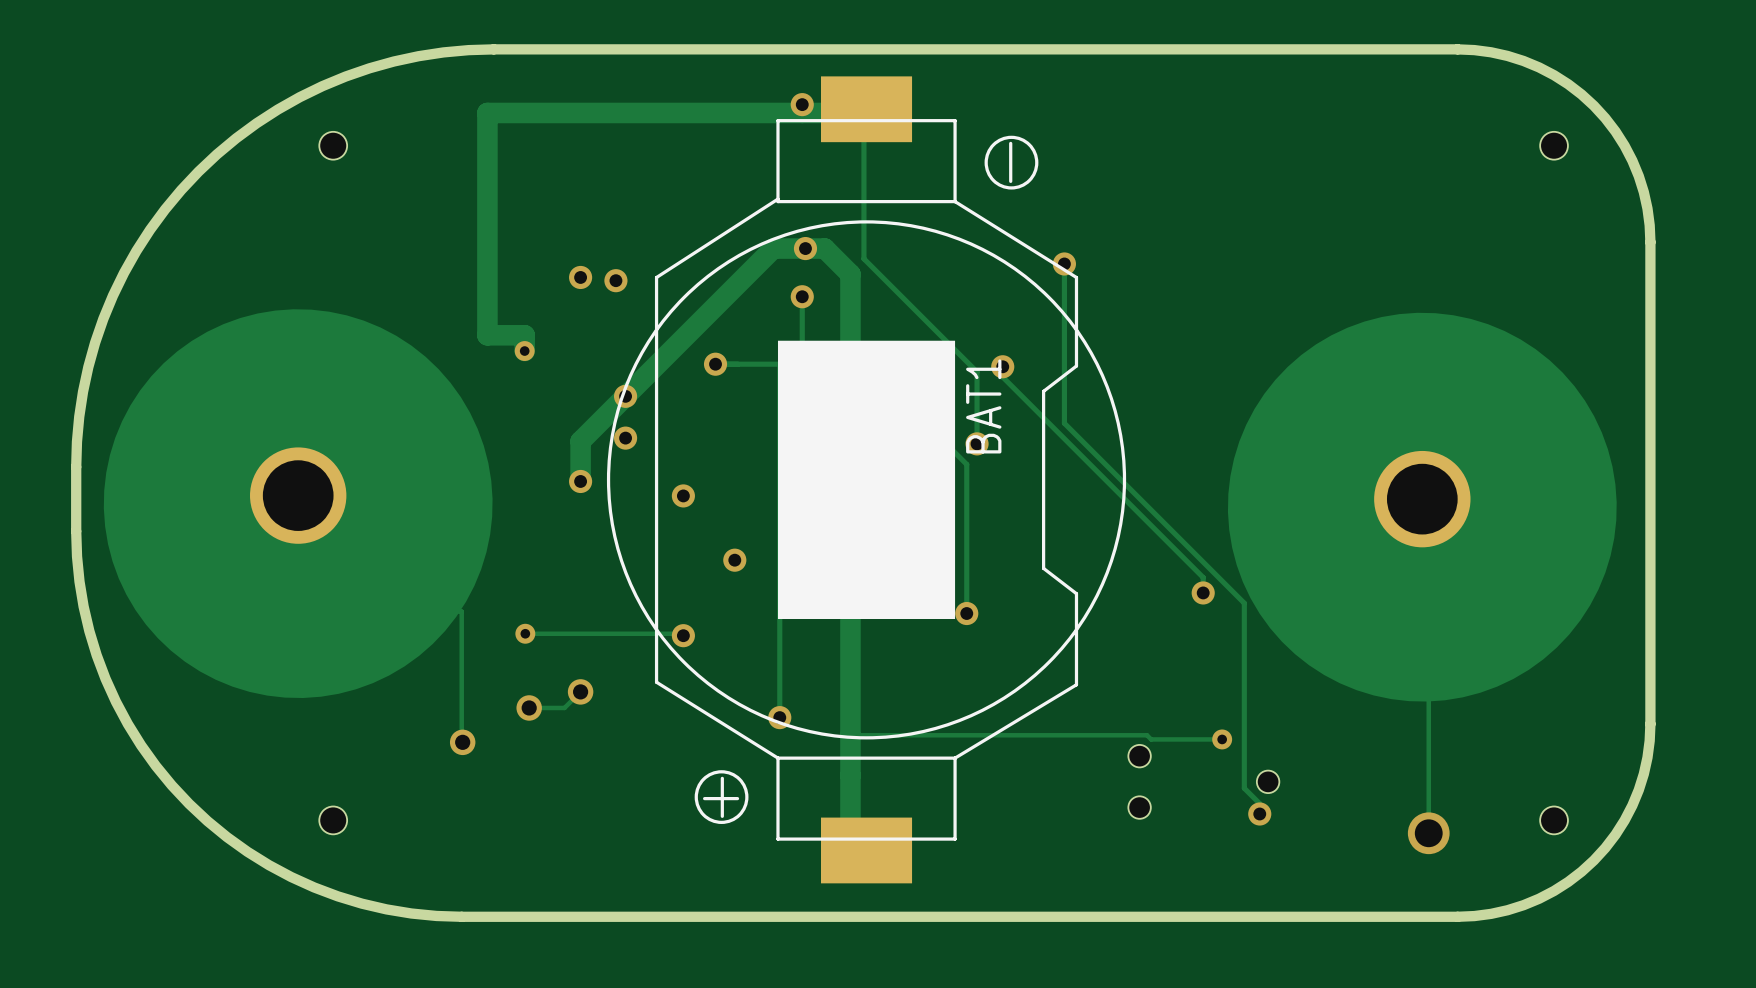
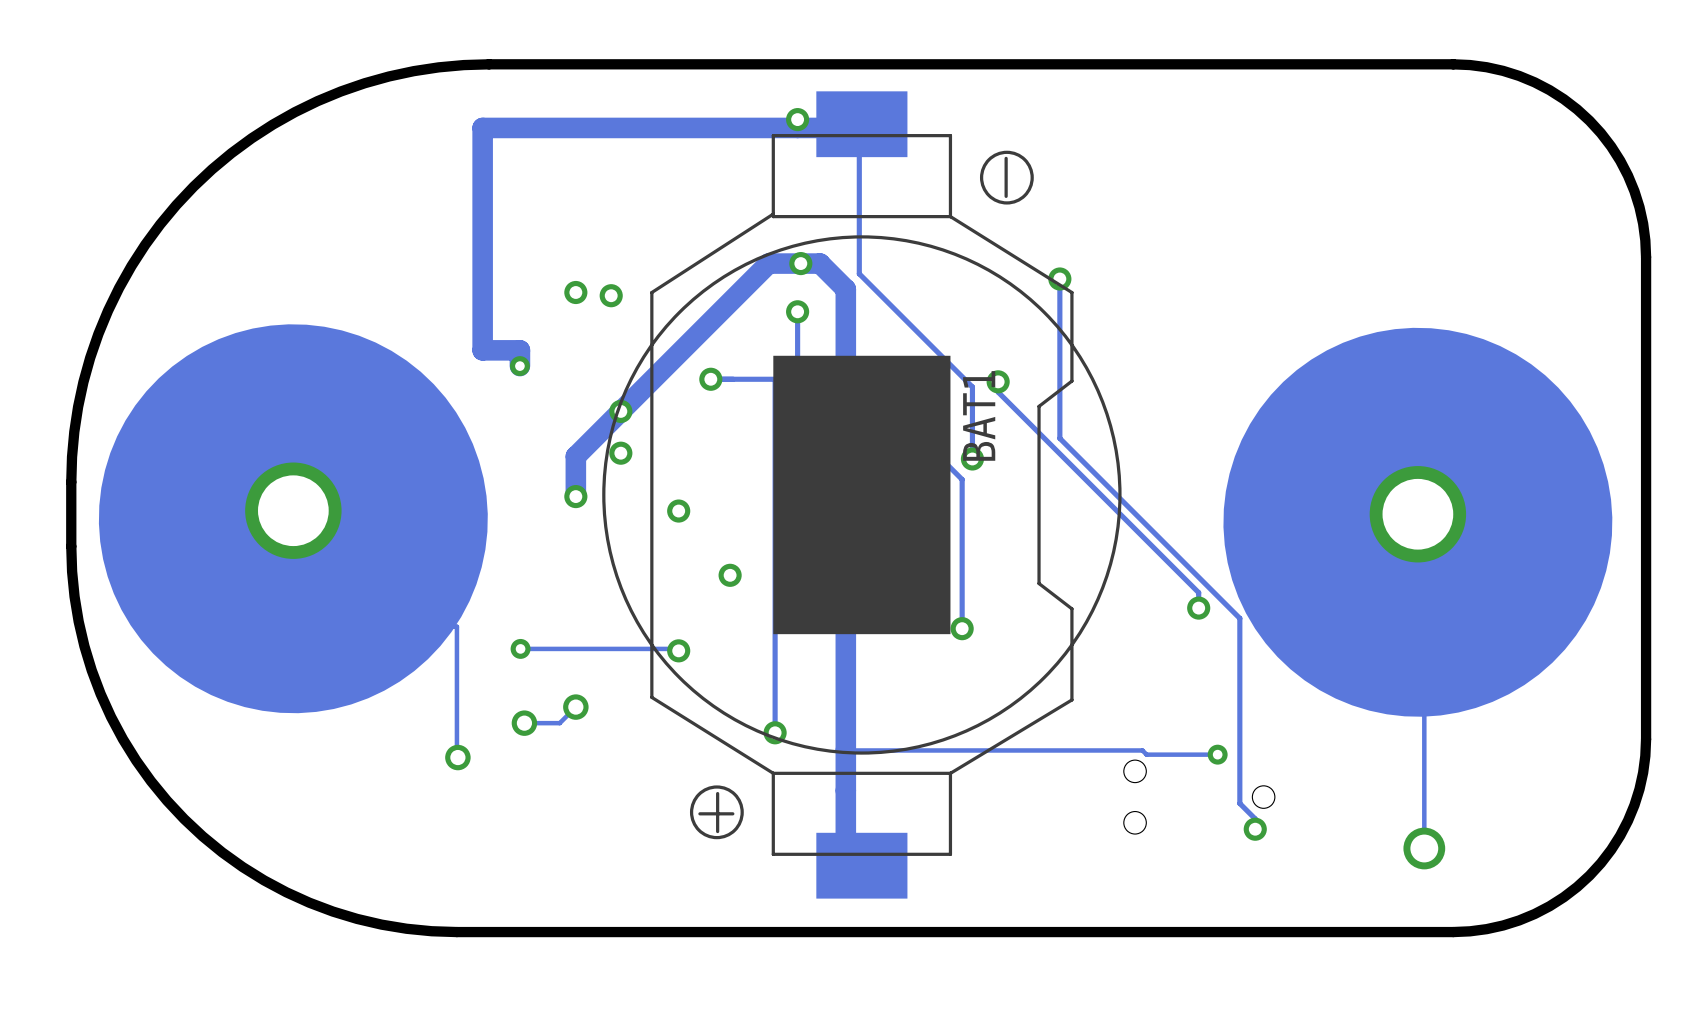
hole: (333, 145) -> none
hole: (1554, 145) -> none
hole: (333, 820) -> none
hole: (1554, 820) -> none

